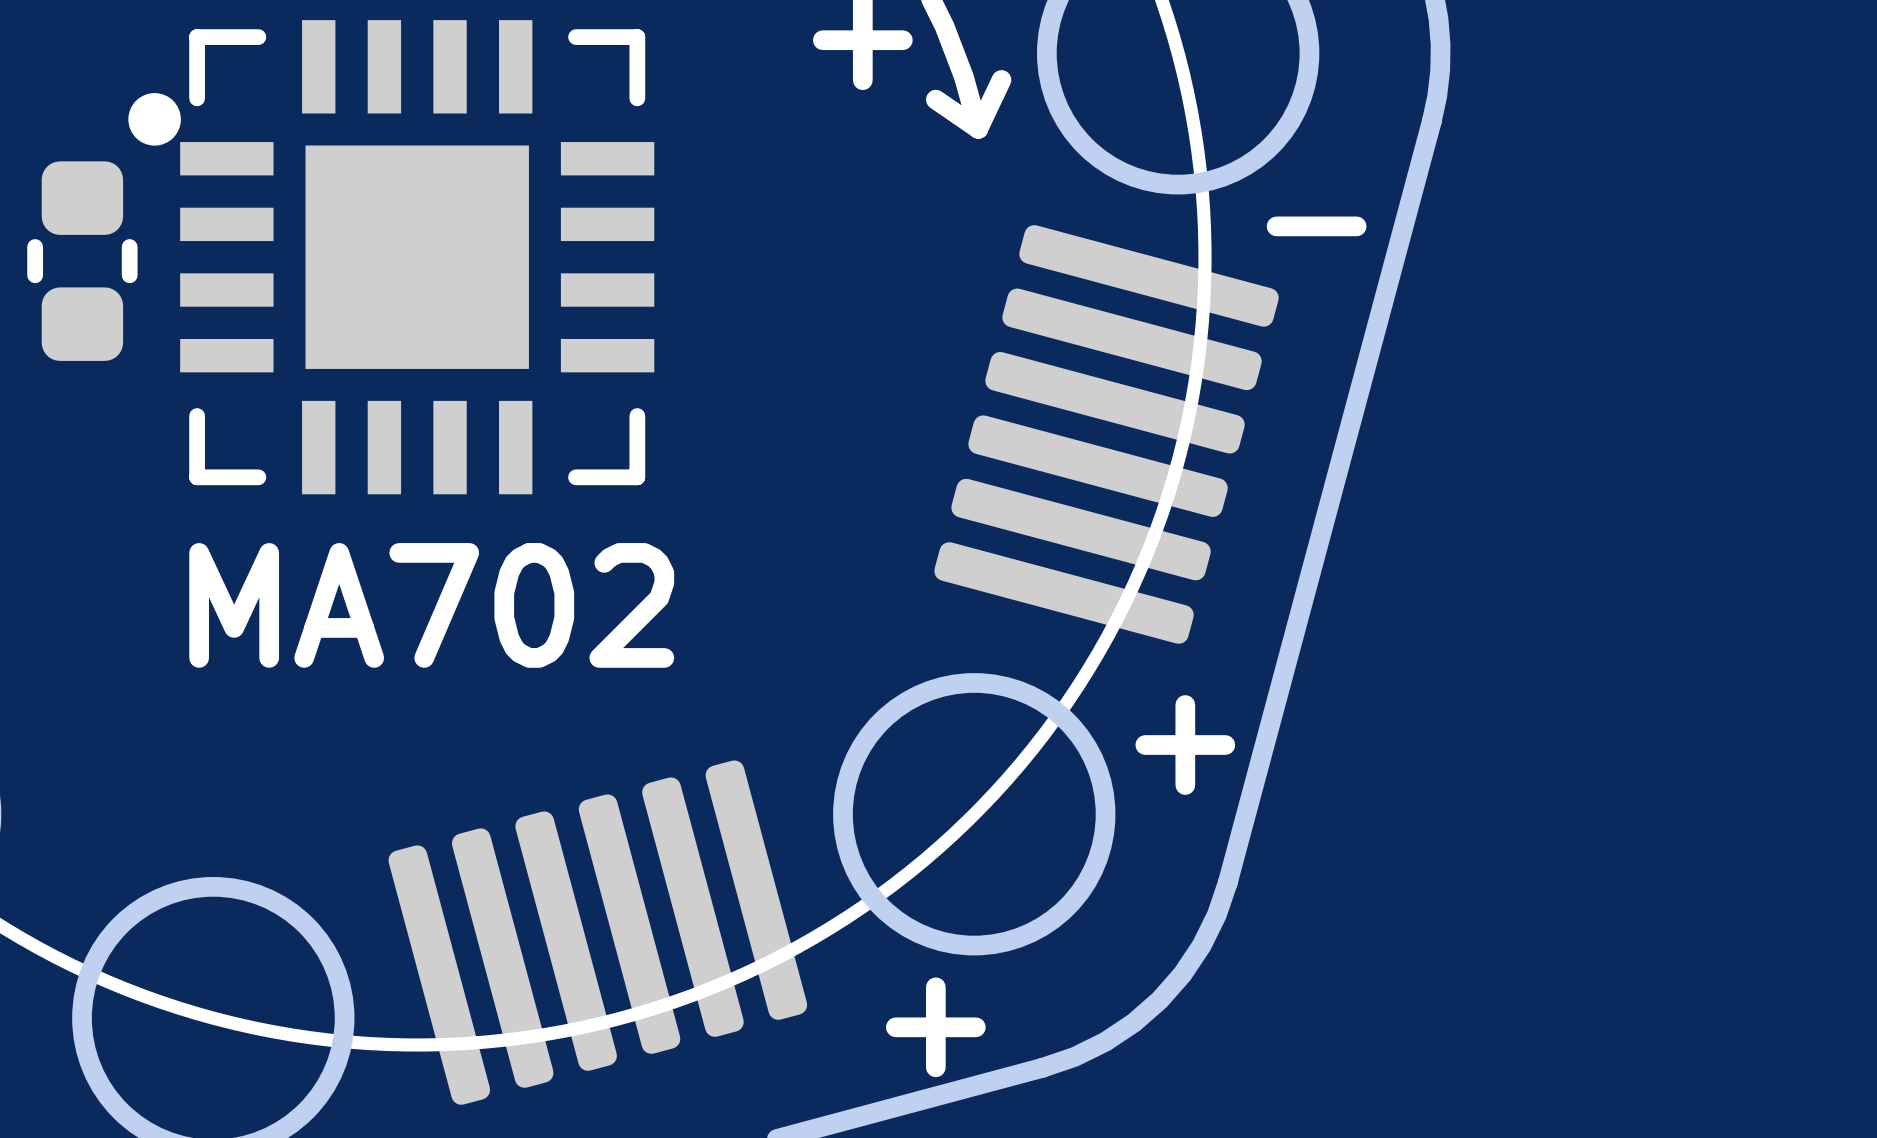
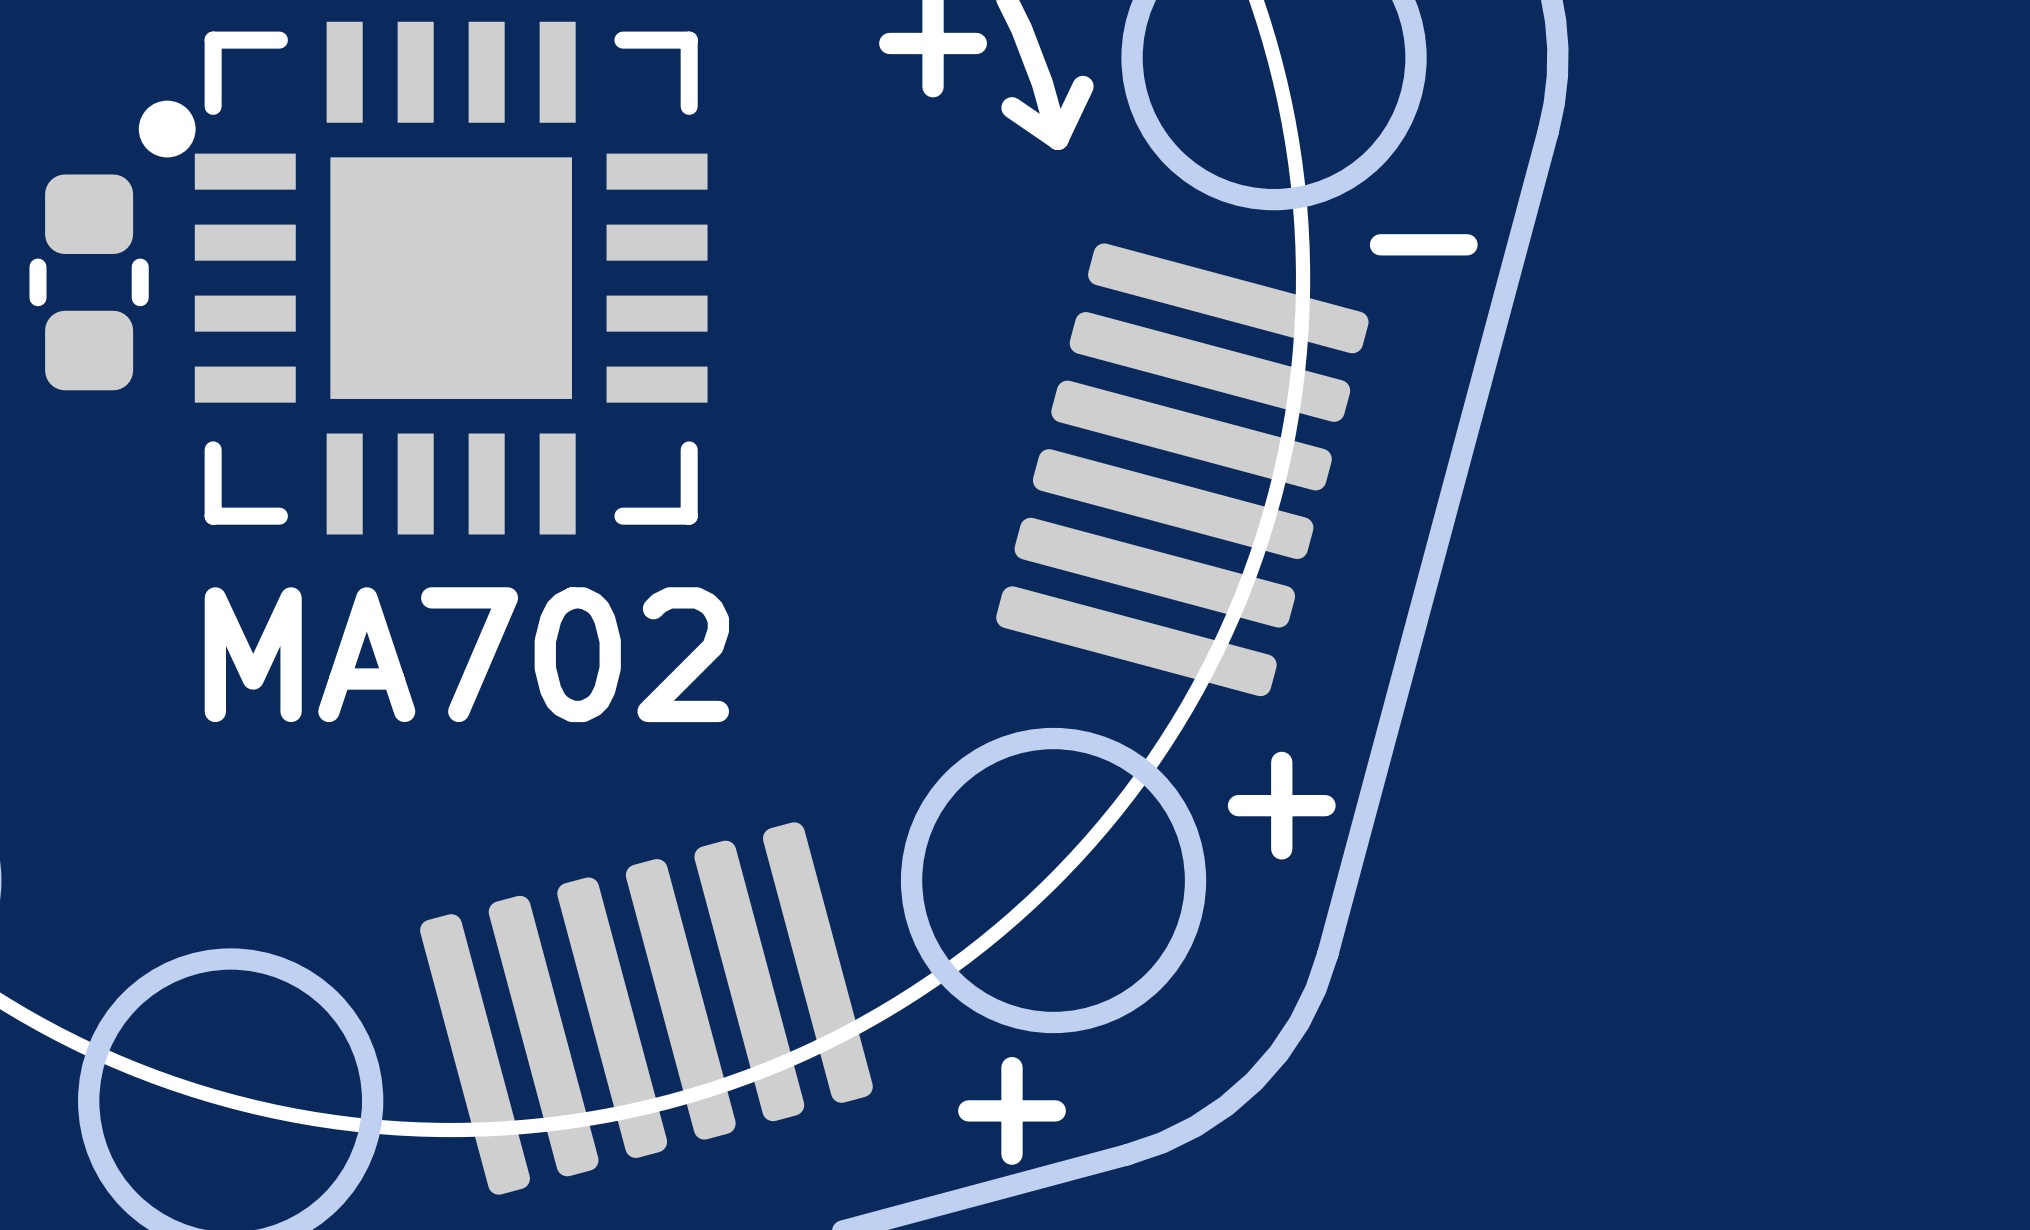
part position: (1106, 434) -> (1182, 469)

